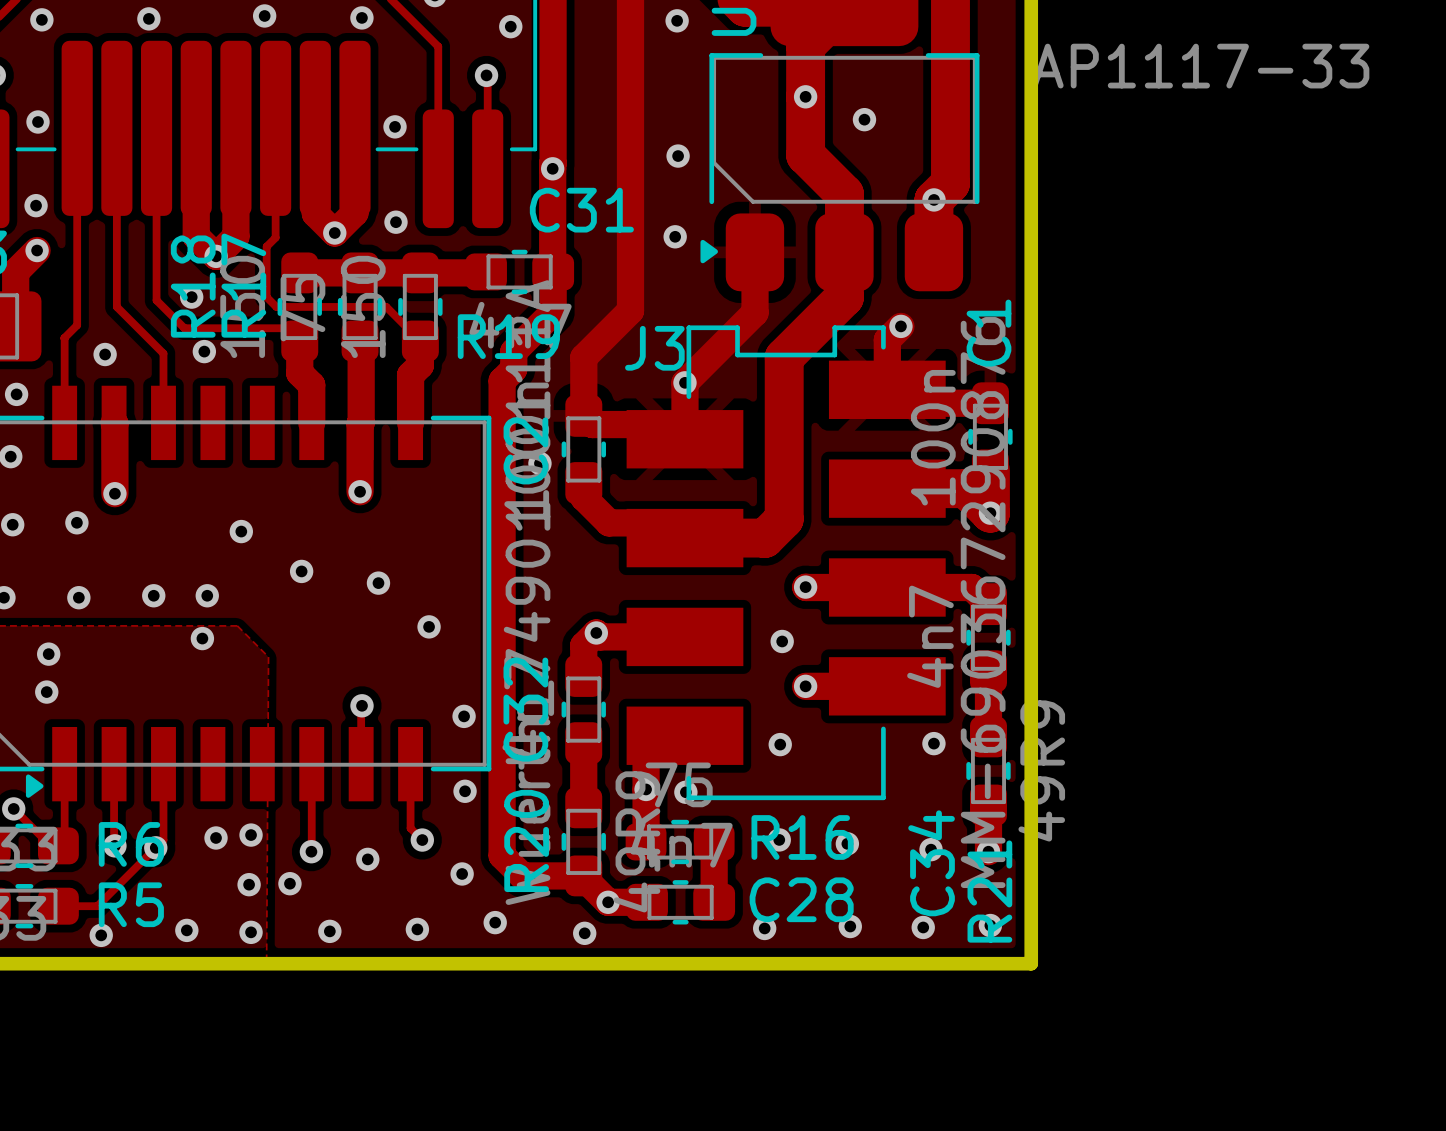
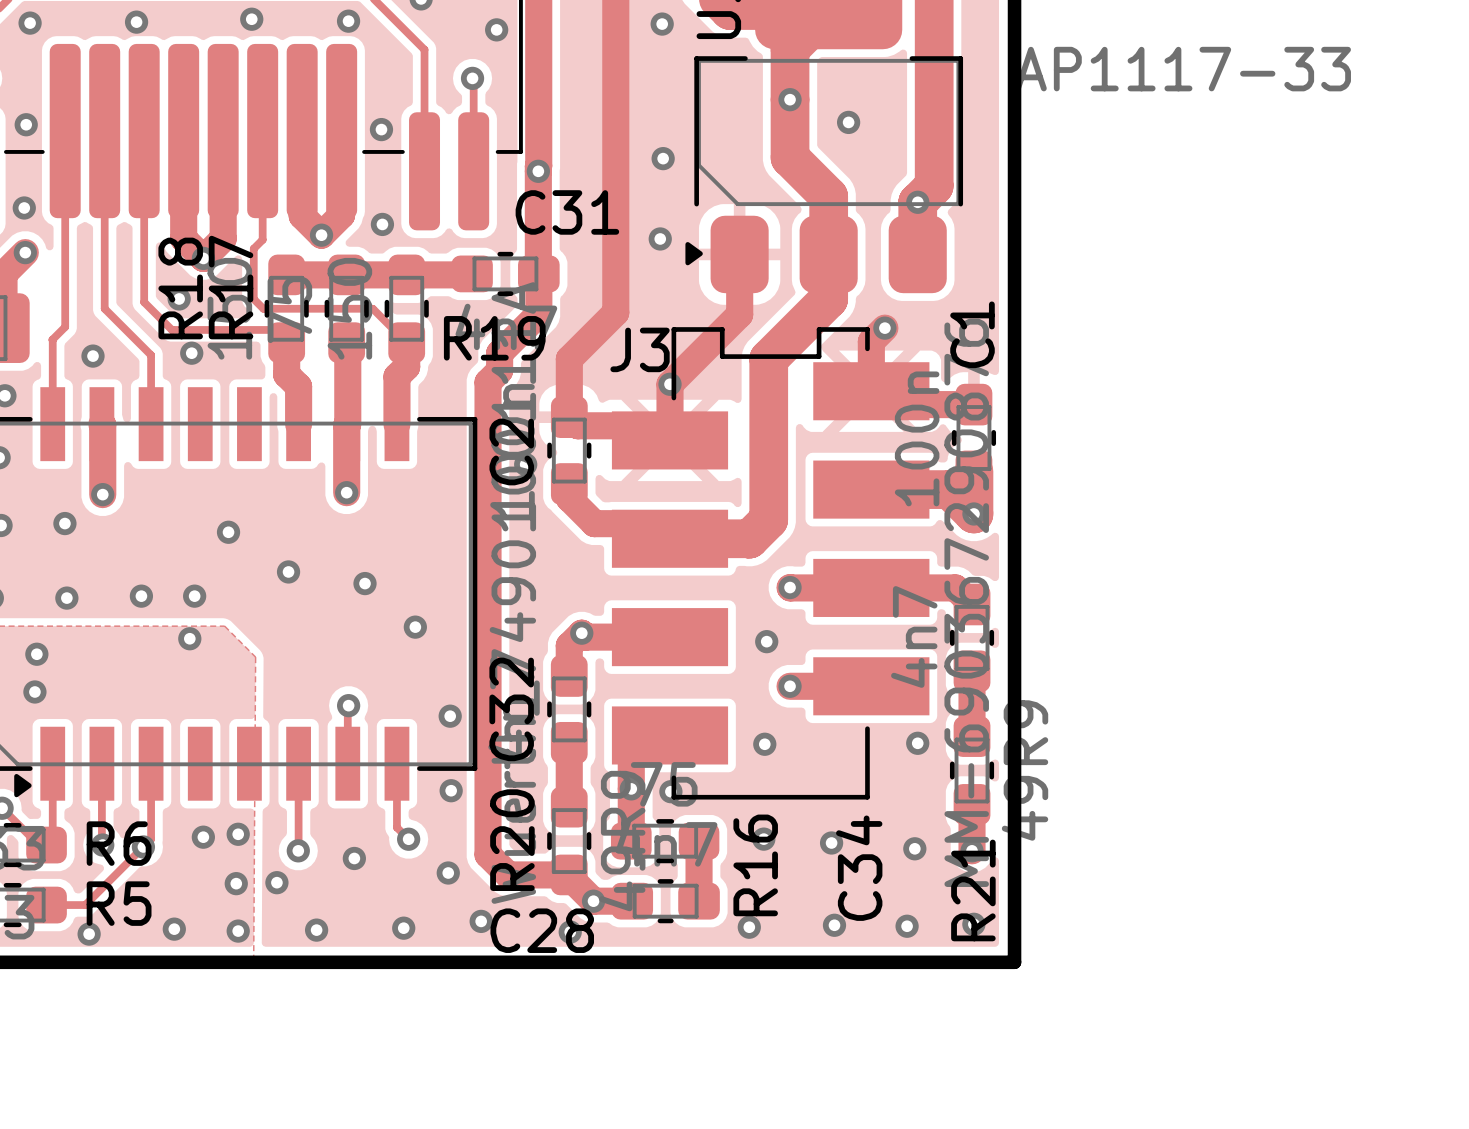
R16 name rotation: 0° (802, 837) -> 90° counterclockwise (755, 865)
C34 name position: C34 (931, 863) -> C34 (859, 868)
C28 name position: C28 (801, 899) -> C28 (542, 930)

